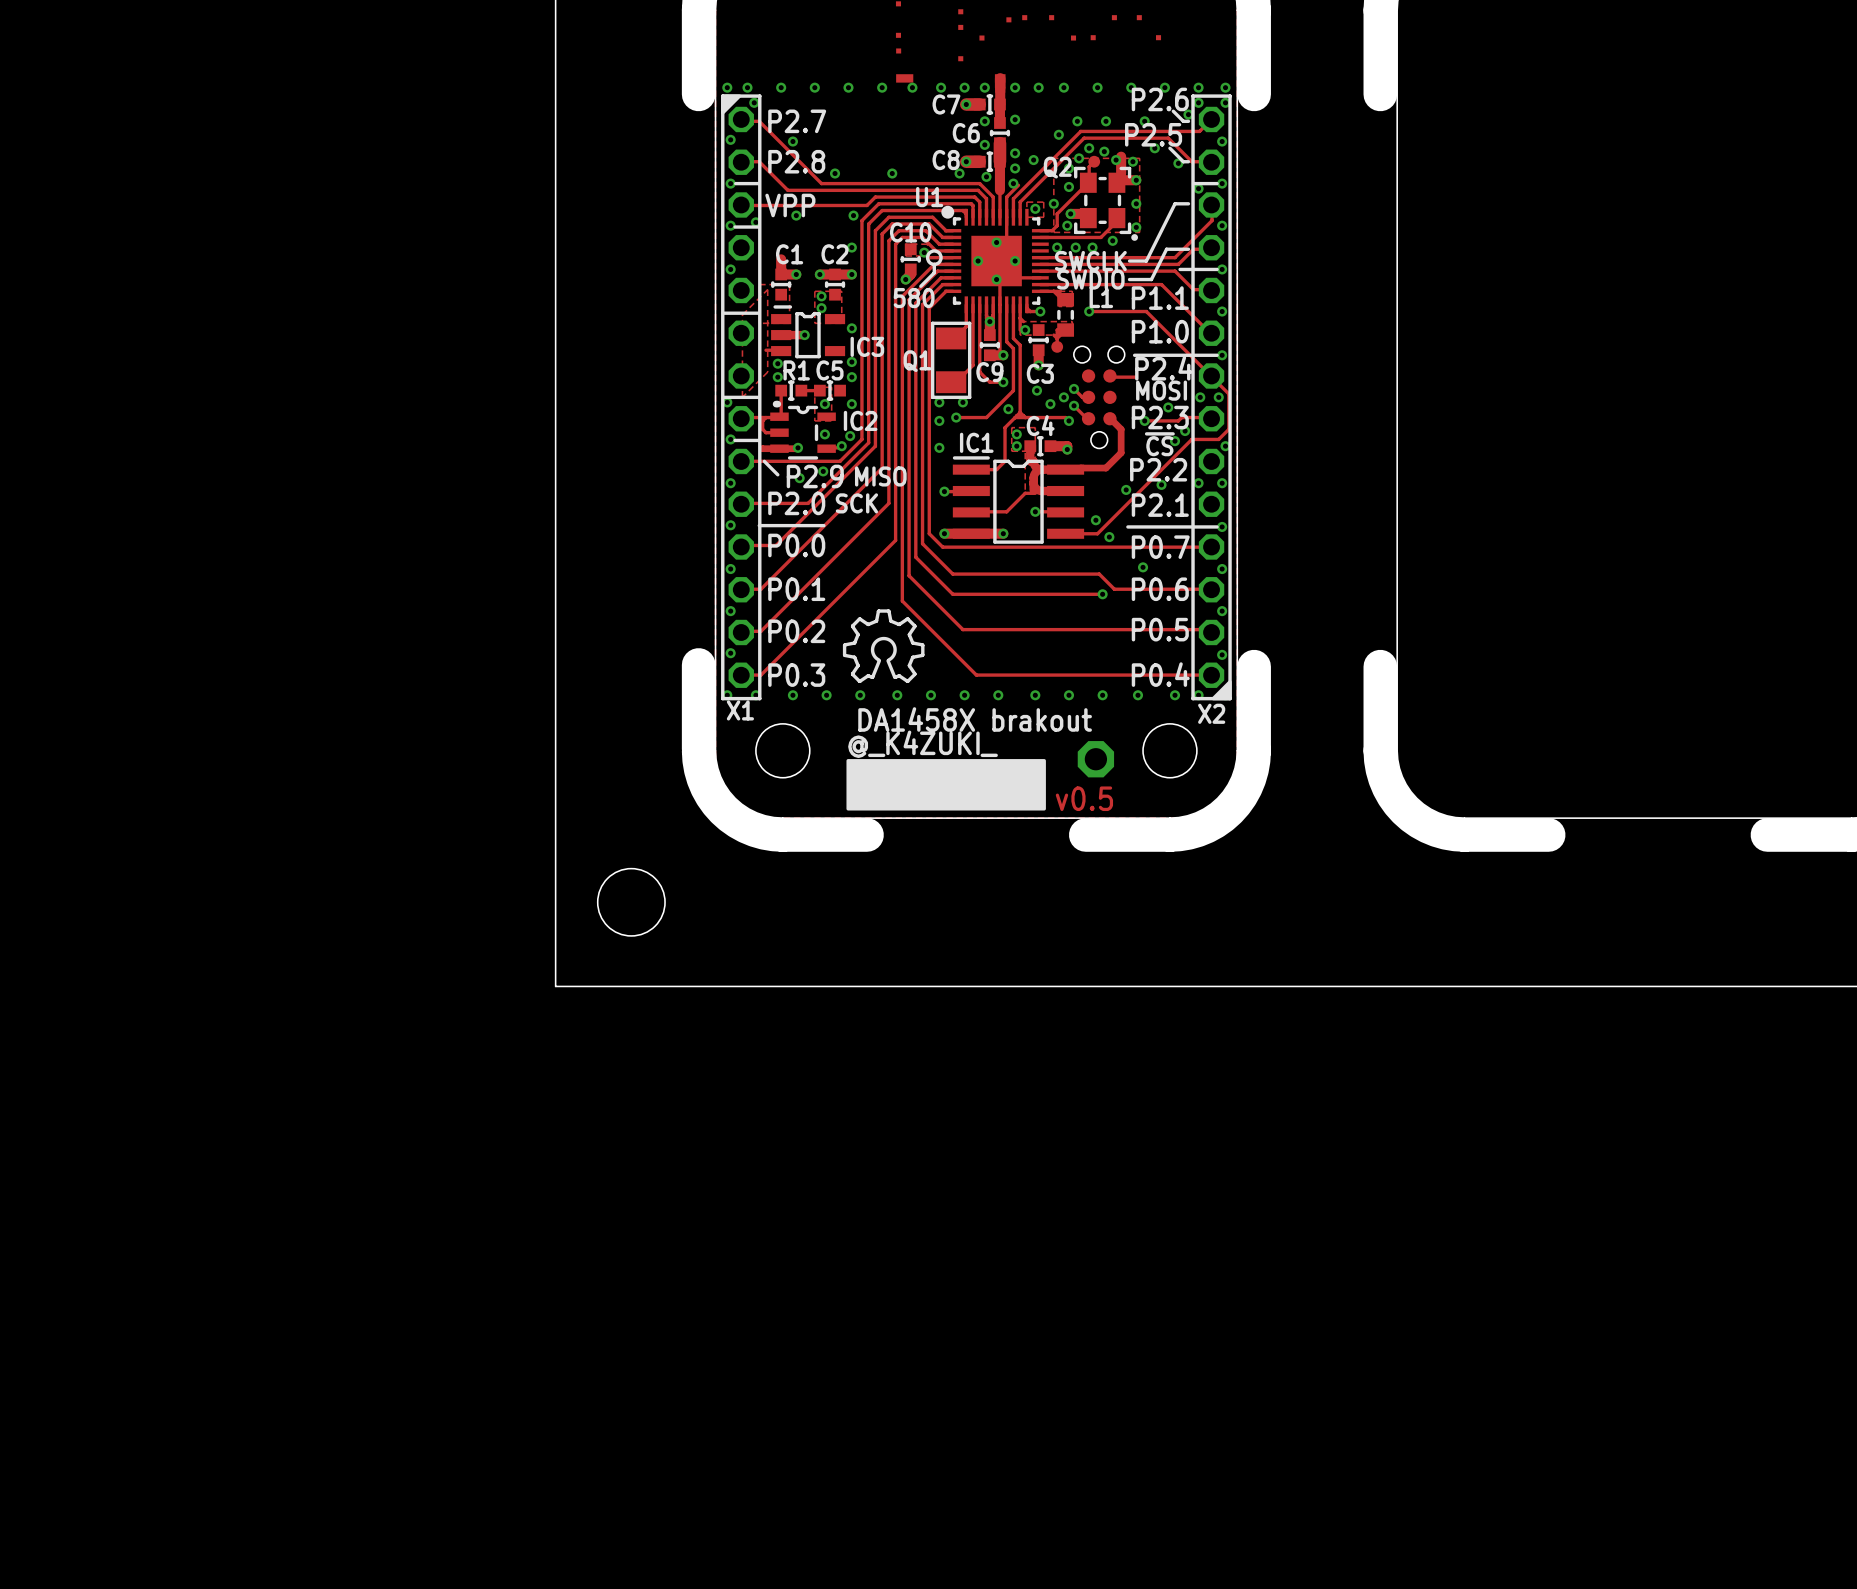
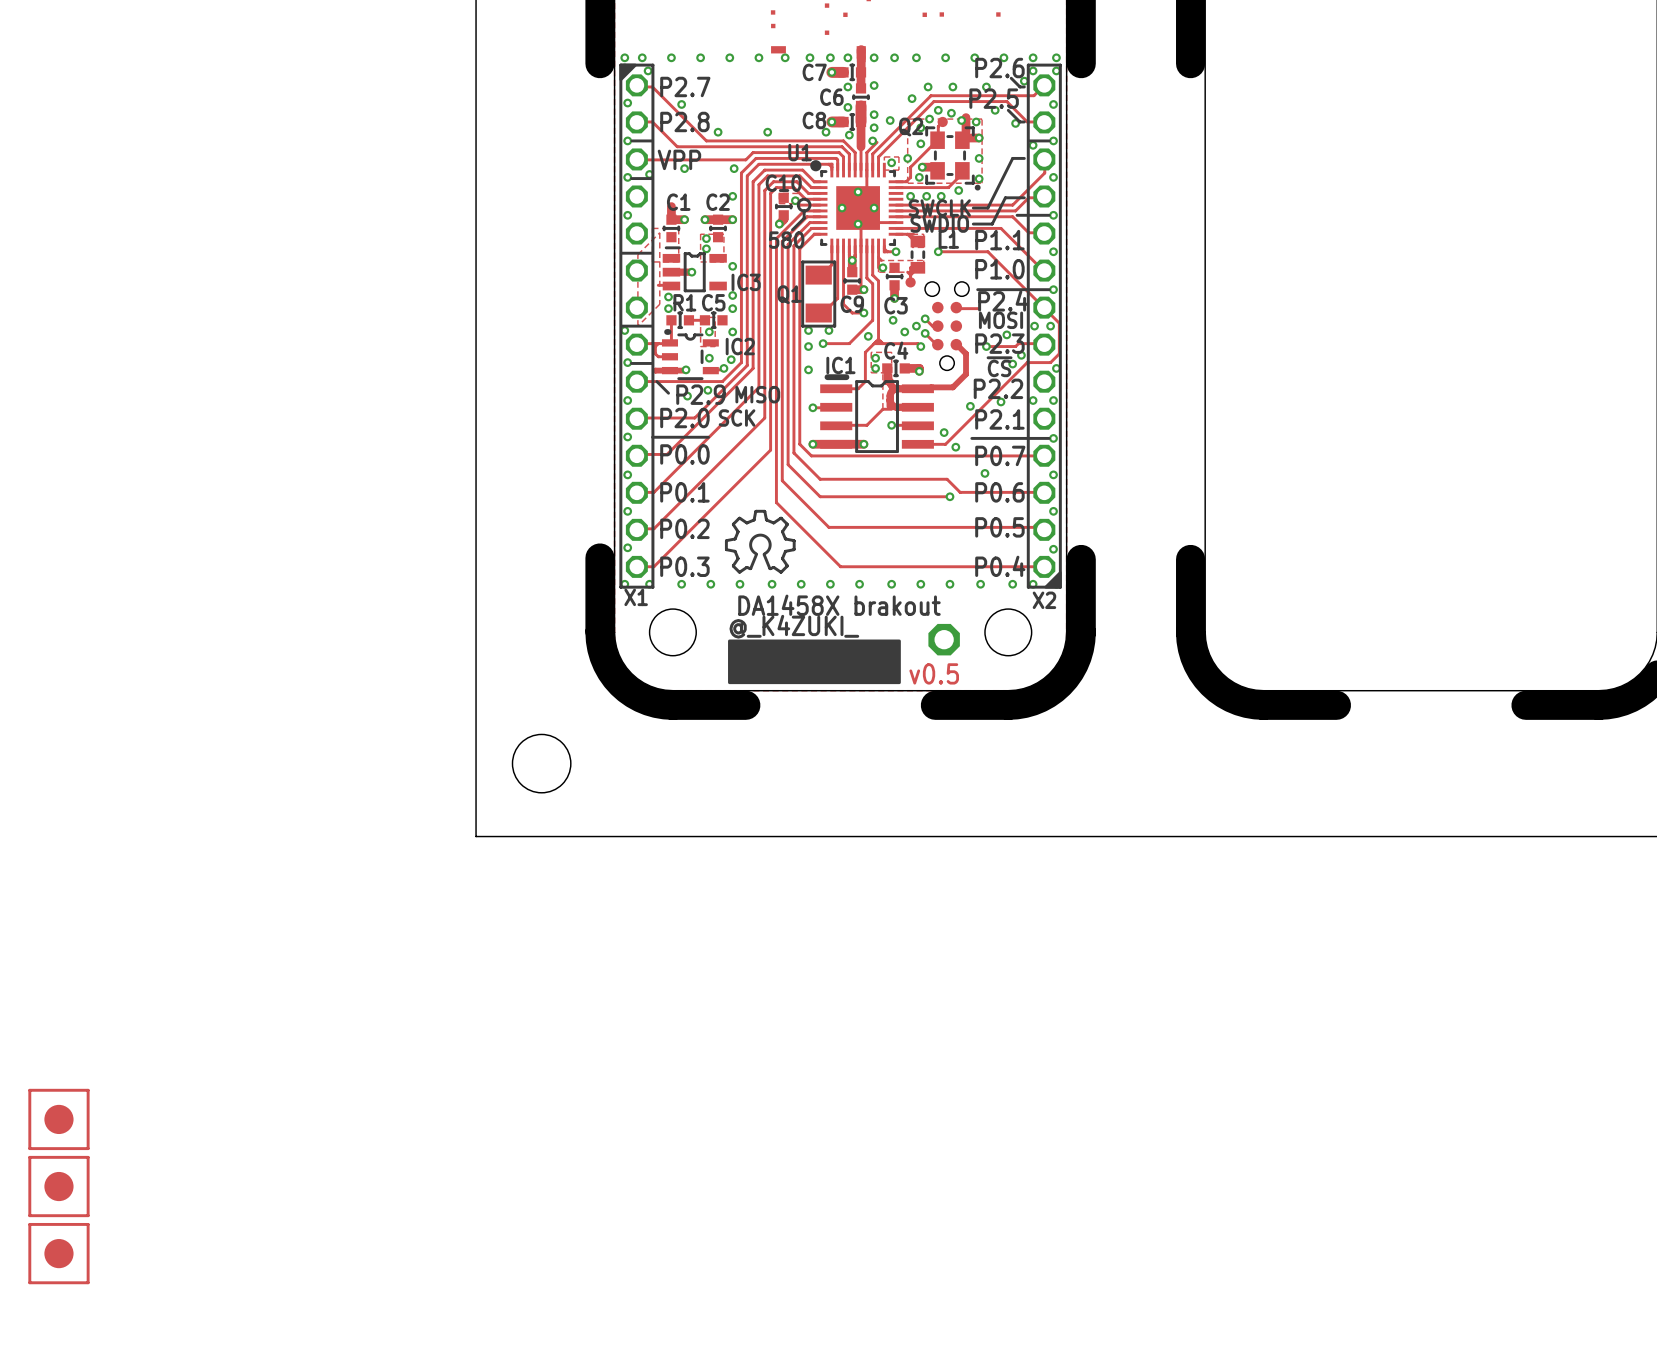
IC1 footprint: [952, 456, 1085, 544] -> [820, 374, 934, 454]
part: none -> (58, 1119)
part: none -> (58, 1186)
part: none -> (58, 1253)

